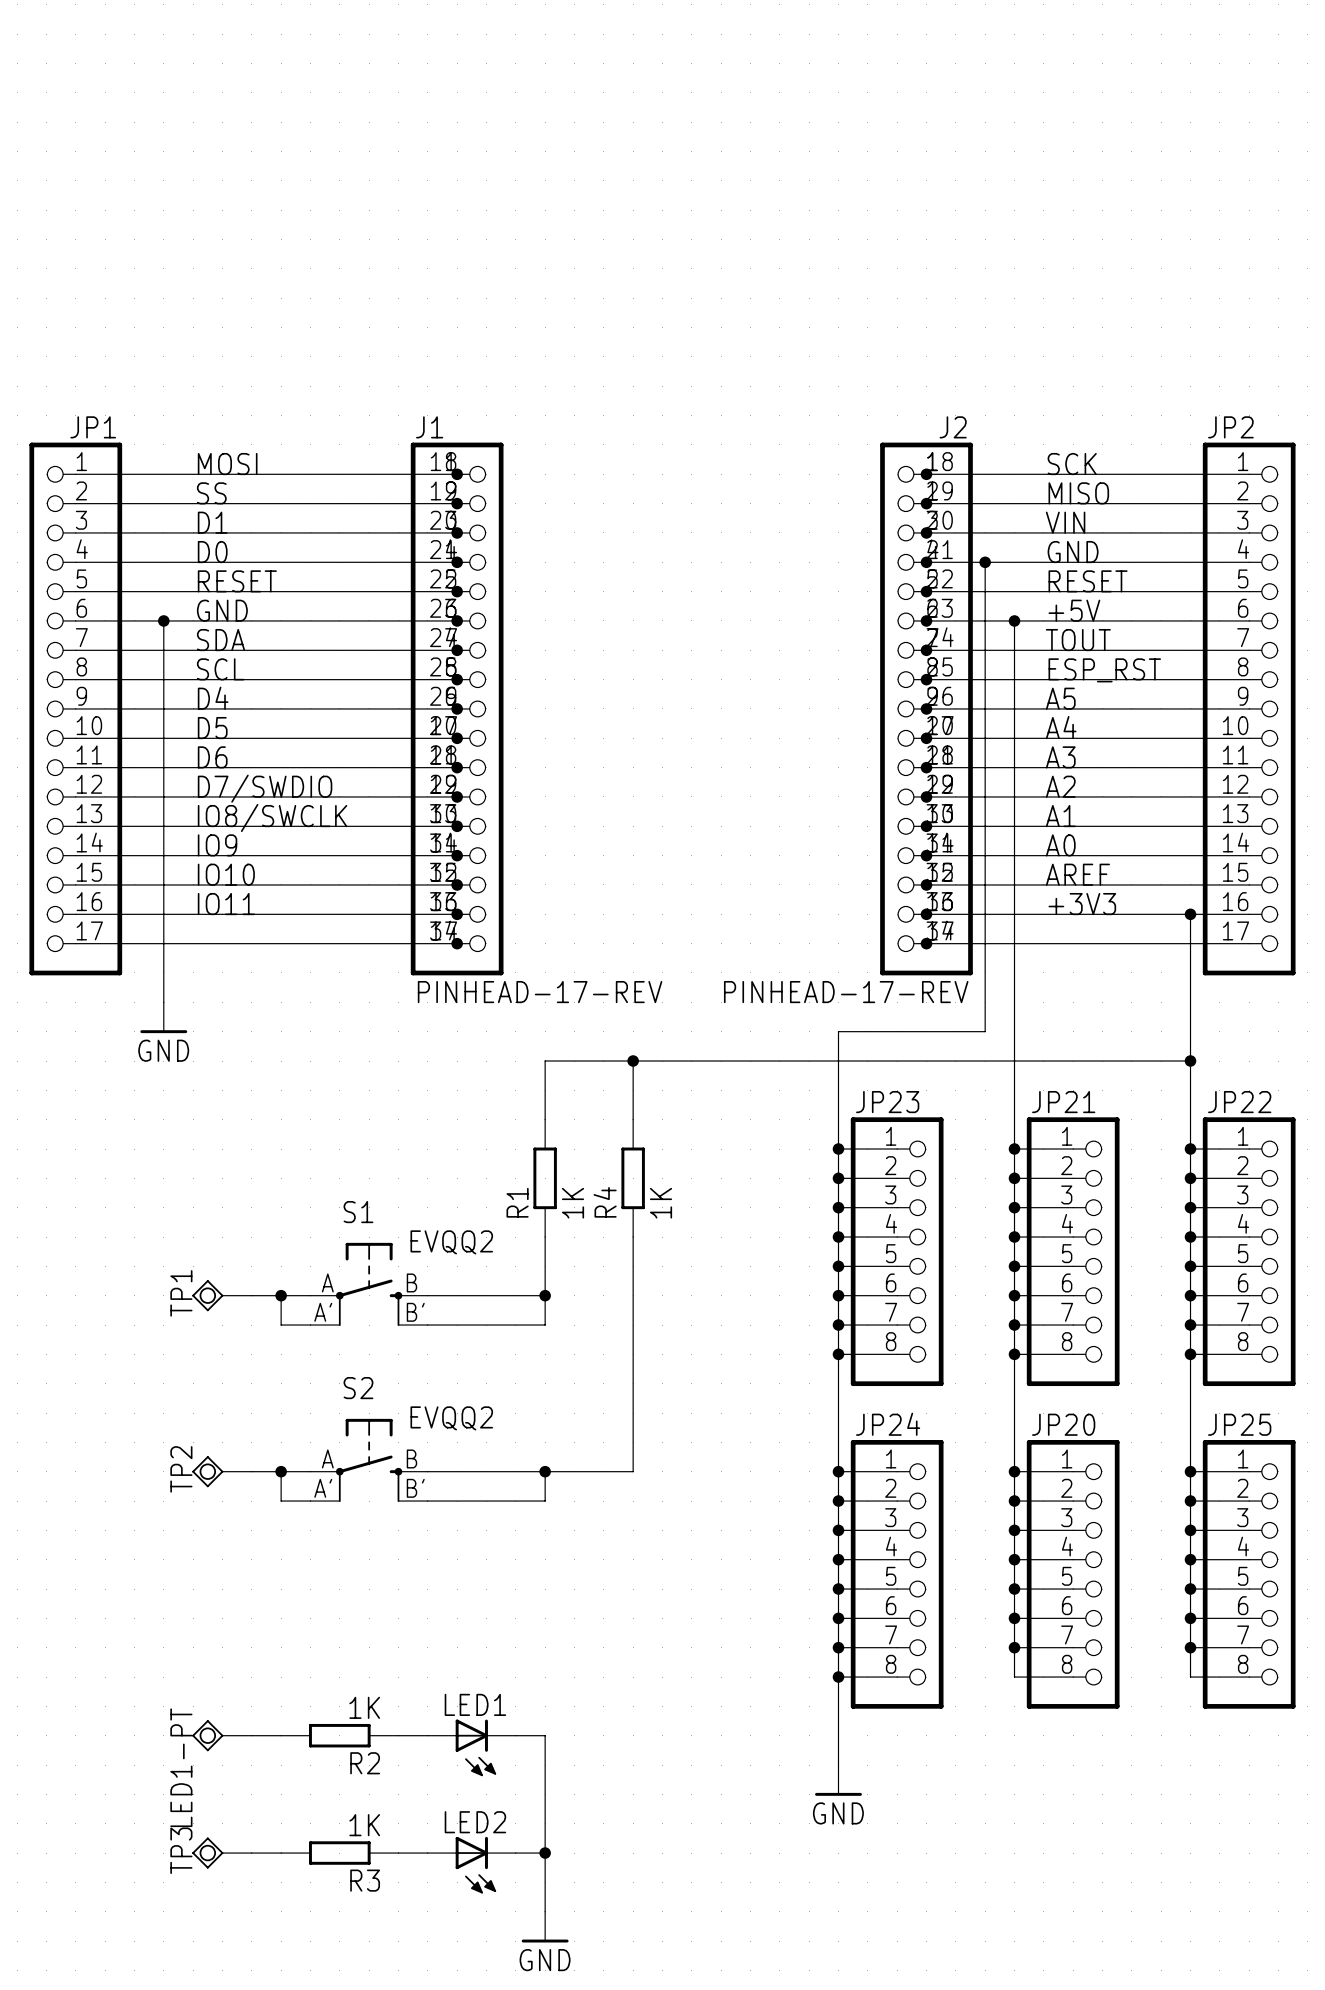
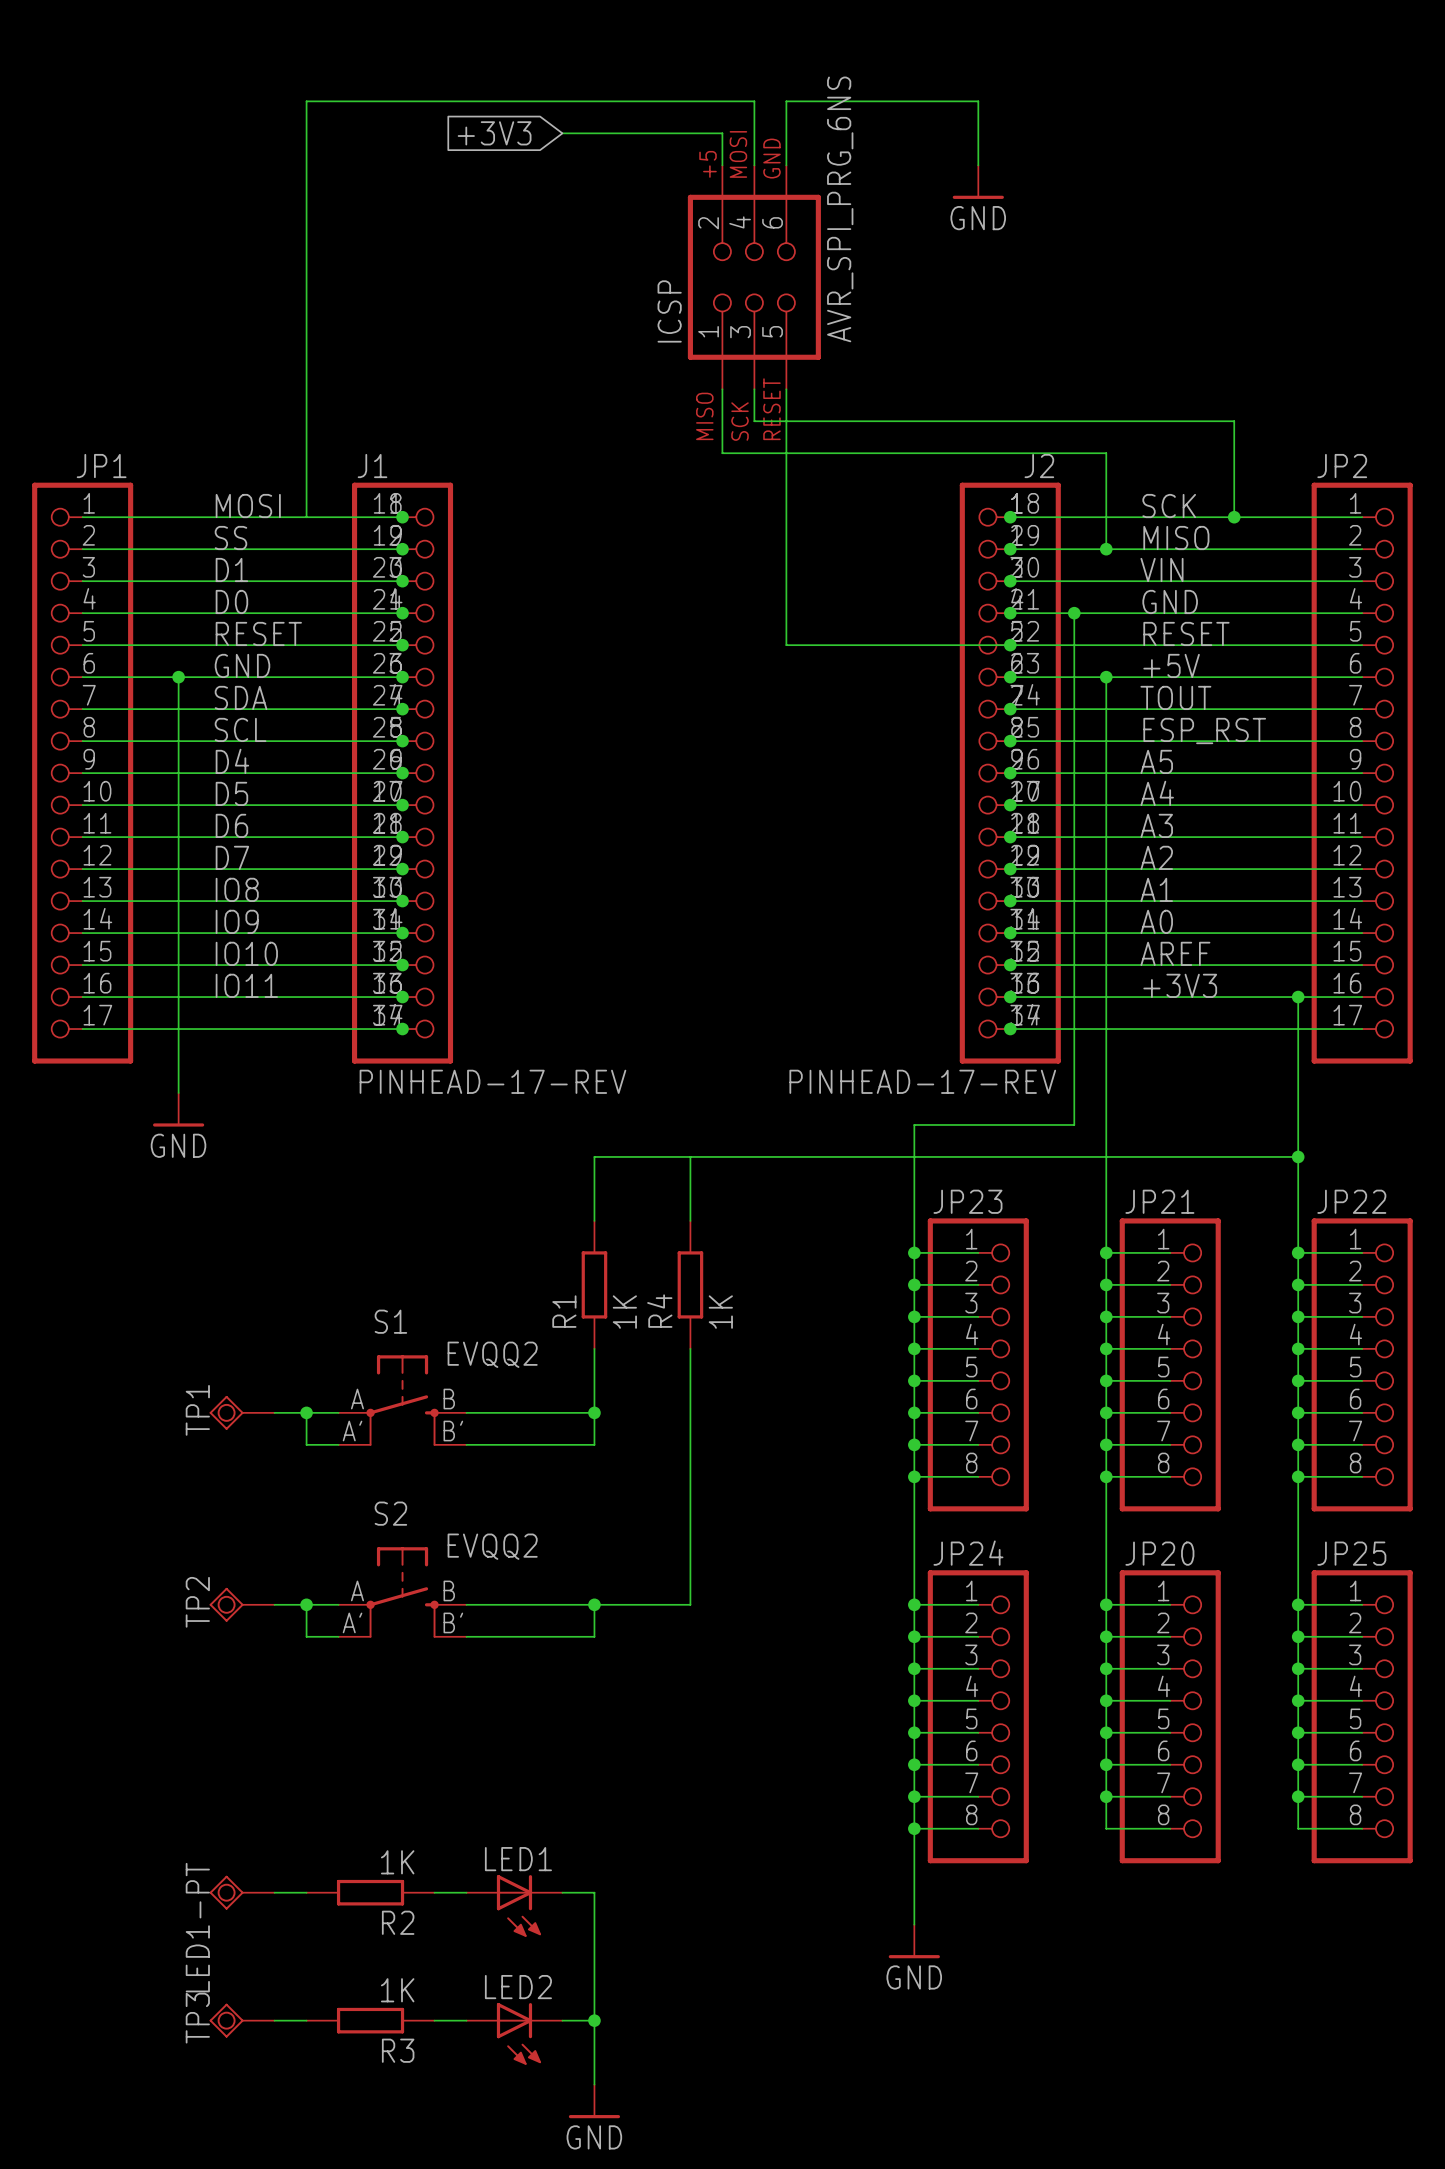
global label: none -> +3V3 (494, 133)
wire: none -> (562, 133) (722, 133) (722, 165)
wire: none -> (754, 165) (754, 101) (306, 101) (306, 517)
wire: none -> (786, 165) (786, 101) (978, 101) (978, 165)
power symbol: none -> GND (978, 182)
ICSP: none -> AVR_SPI_PRG_6NS (754, 277)
wire: none -> (722, 389) (722, 453) (1106, 453) (1106, 549)
wire: none -> (754, 389) (754, 421) (1234, 421) (1234, 517)
wire: none -> (786, 389) (786, 645) (1010, 645)
wire: (369, 474) (457, 474) -> none
junction: none -> (402, 517)
junction: (457, 474) -> none
junction: none -> (1234, 517)
wire: (369, 503) (457, 503) -> none
junction: none -> (402, 549)
junction: (457, 503) -> none
junction: none -> (1106, 549)
wire: (369, 532) (457, 532) -> none
junction: none -> (402, 581)
junction: (457, 532) -> none
wire: (369, 562) (457, 562) -> none
junction: none -> (402, 613)
junction: (457, 562) -> none
wire: (369, 591) (457, 591) -> none
junction: none -> (402, 645)
junction: (457, 591) -> none
wire: (369, 620) (457, 620) -> none
junction: none -> (402, 677)
junction: (457, 620) -> none
wire: (369, 650) (457, 650) -> none
junction: none -> (402, 709)
junction: (457, 650) -> none
wire: (369, 679) (457, 679) -> none
junction: none -> (402, 741)
junction: (457, 679) -> none
wire: (369, 708) (457, 708) -> none
junction: none -> (402, 773)
J1 position: (457, 708) -> (402, 773)
junction: (457, 708) -> none
wire: (369, 738) (457, 738) -> none
junction: none -> (402, 805)
junction: (457, 738) -> none
wire: (369, 767) (457, 767) -> none
junction: none -> (402, 837)
junction: (457, 767) -> none
label: D7/SWDIO (265, 788) -> D7 (232, 857)
wire: (369, 796) (457, 796) -> none
junction: none -> (402, 869)
junction: (457, 796) -> none
label: IO8/SWCLK (272, 818) -> IO8 (237, 889)
wire: (369, 826) (457, 826) -> none
junction: none -> (402, 901)
junction: (457, 826) -> none
wire: (369, 855) (457, 855) -> none
junction: none -> (402, 933)
junction: (457, 855) -> none
wire: (369, 884) (457, 884) -> none
junction: none -> (402, 965)
junction: (457, 884) -> none
wire: (369, 914) (457, 914) -> none
junction: none -> (402, 997)
junction: (457, 914) -> none
wire: (369, 943) (457, 943) -> none
junction: none -> (402, 1029)
junction: (457, 943) -> none
junction: (633, 1061) -> none

